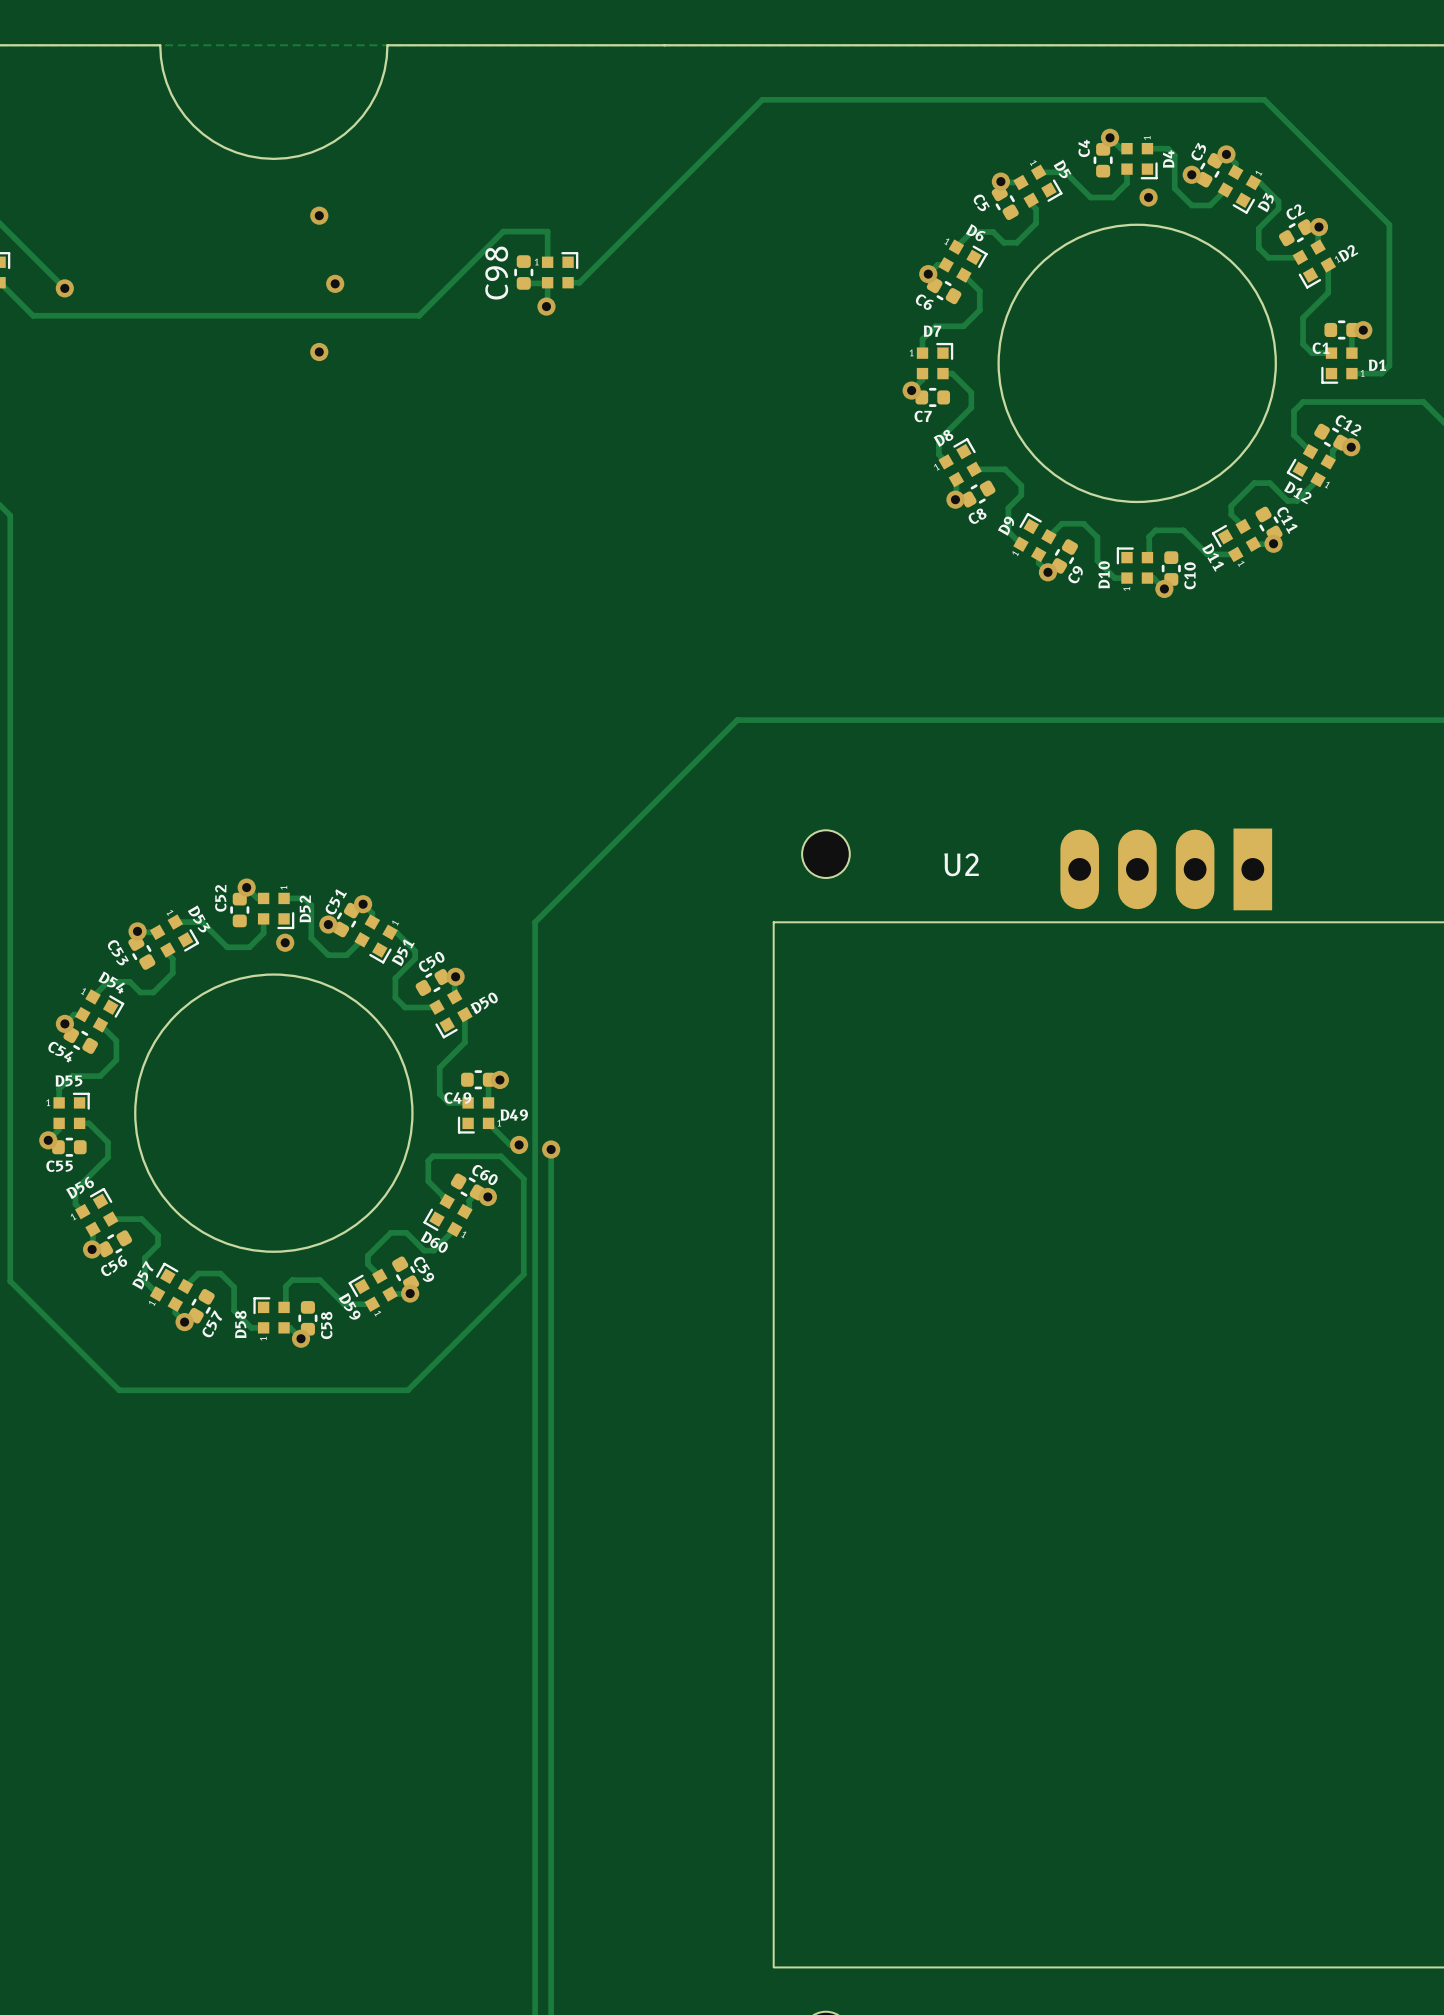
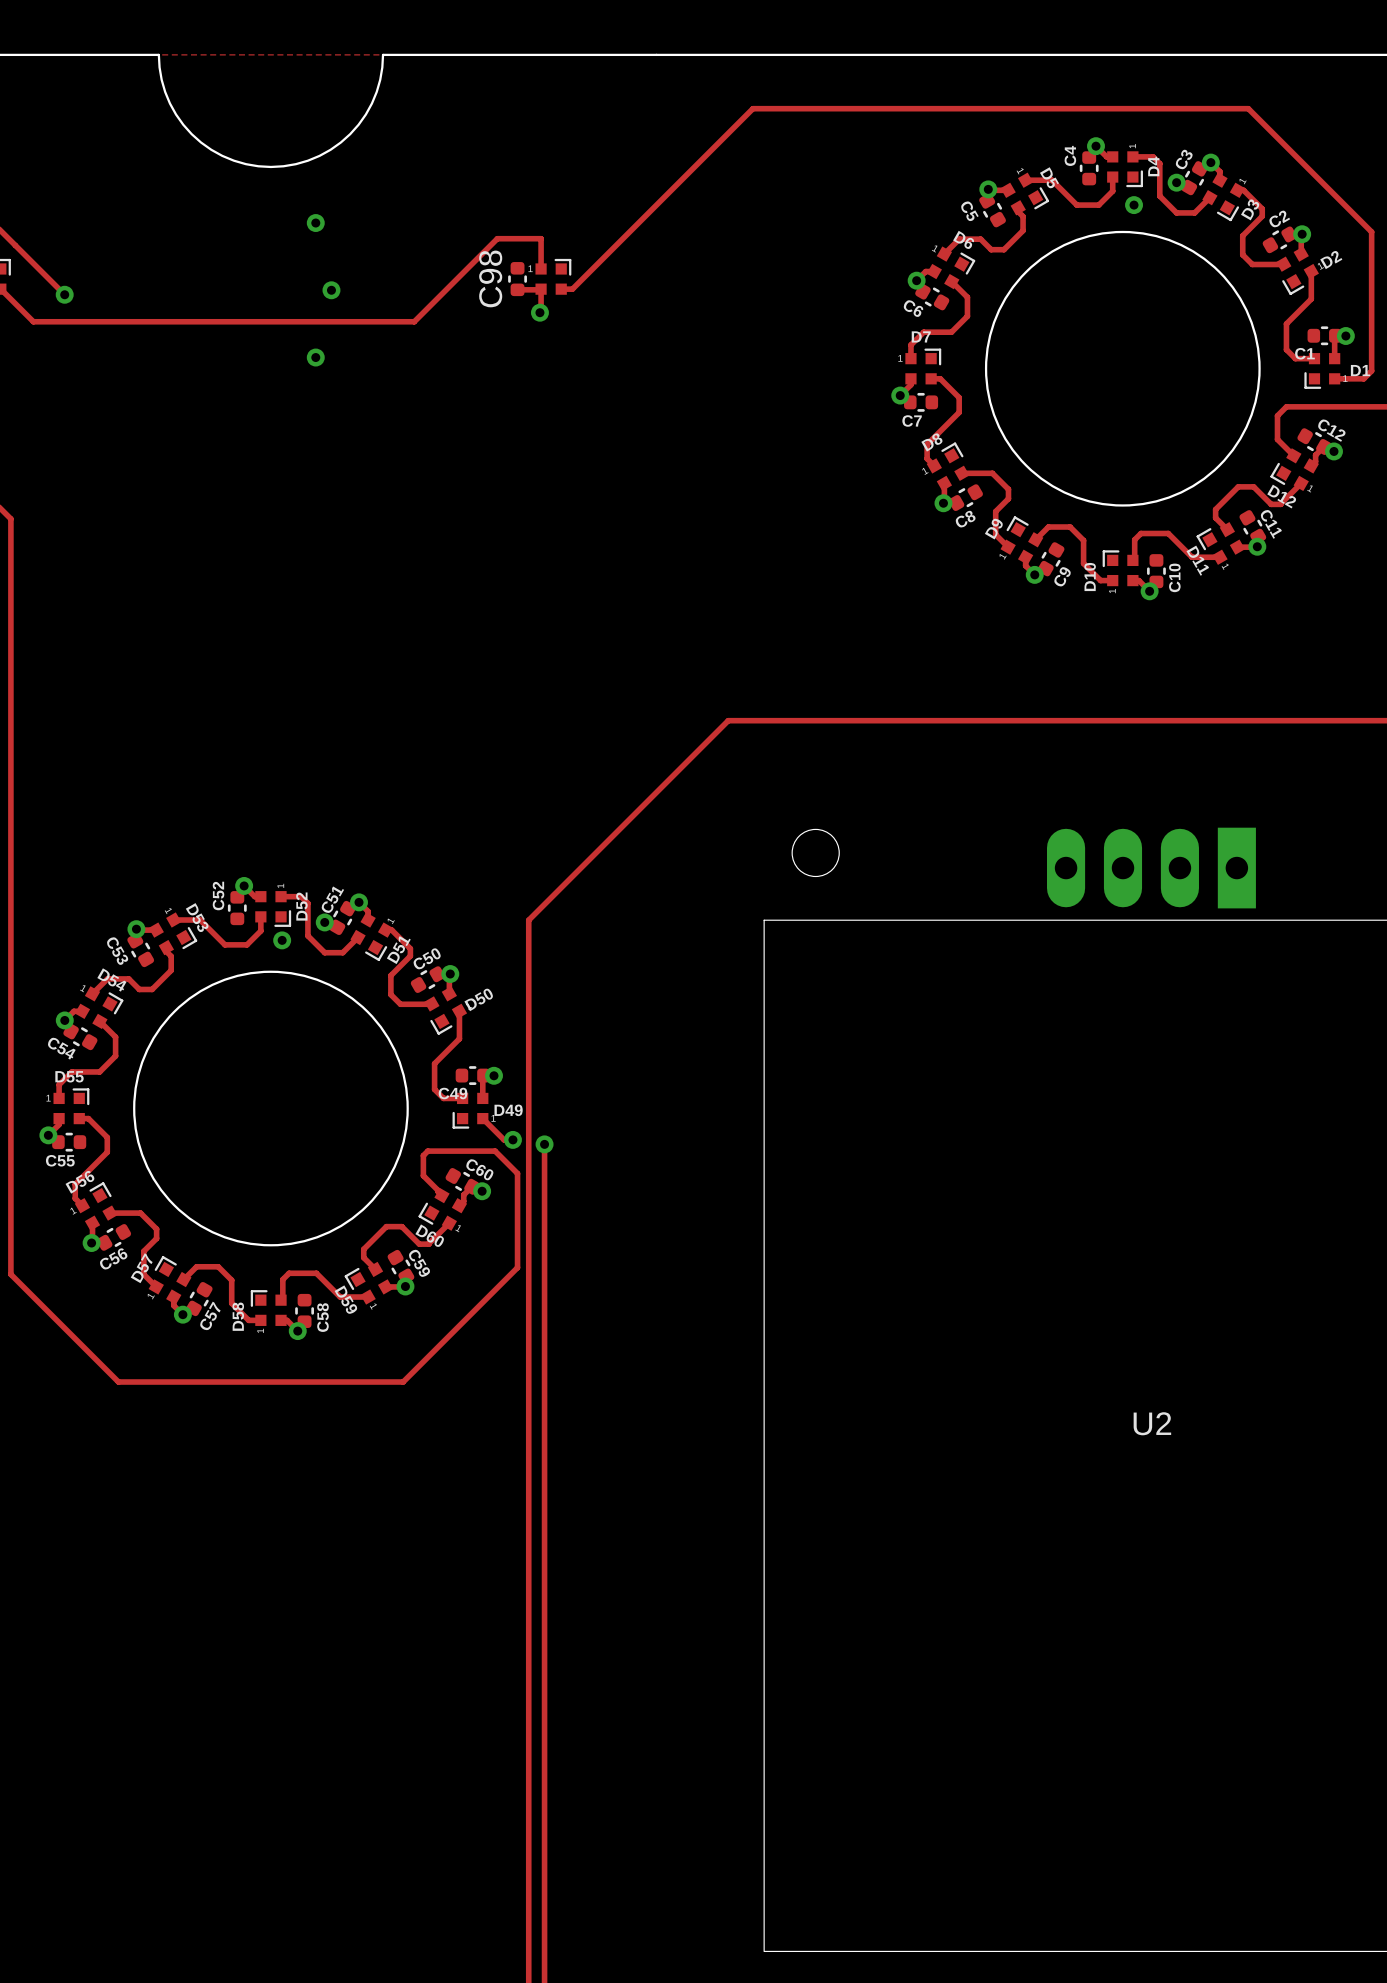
U2 name position: U2 (961, 864) -> U2 (1152, 1423)

